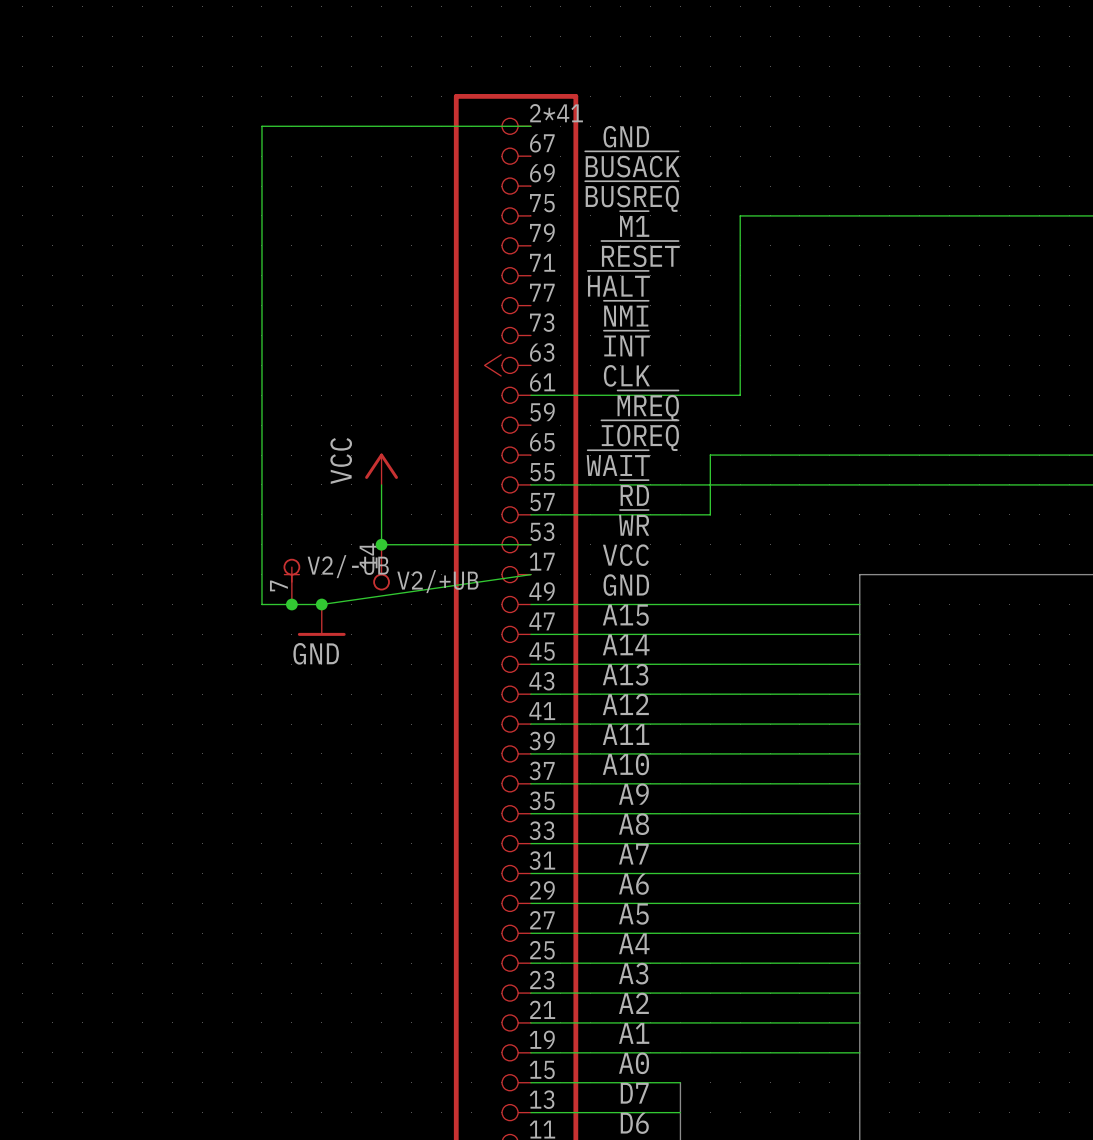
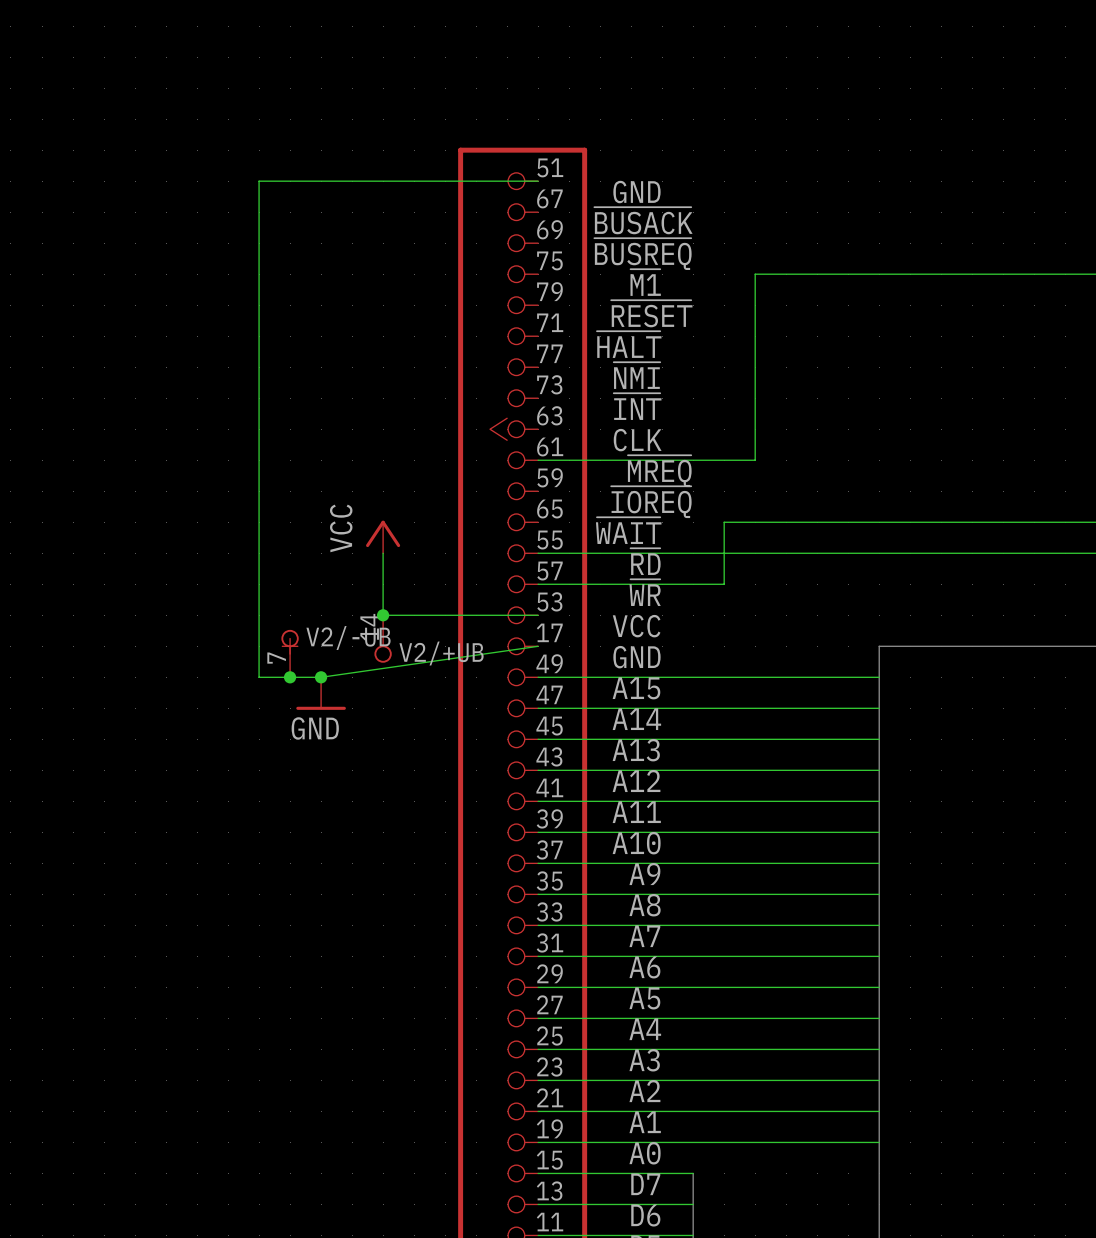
part pin number: 2*41 (556, 113) -> 51 (550, 167)

